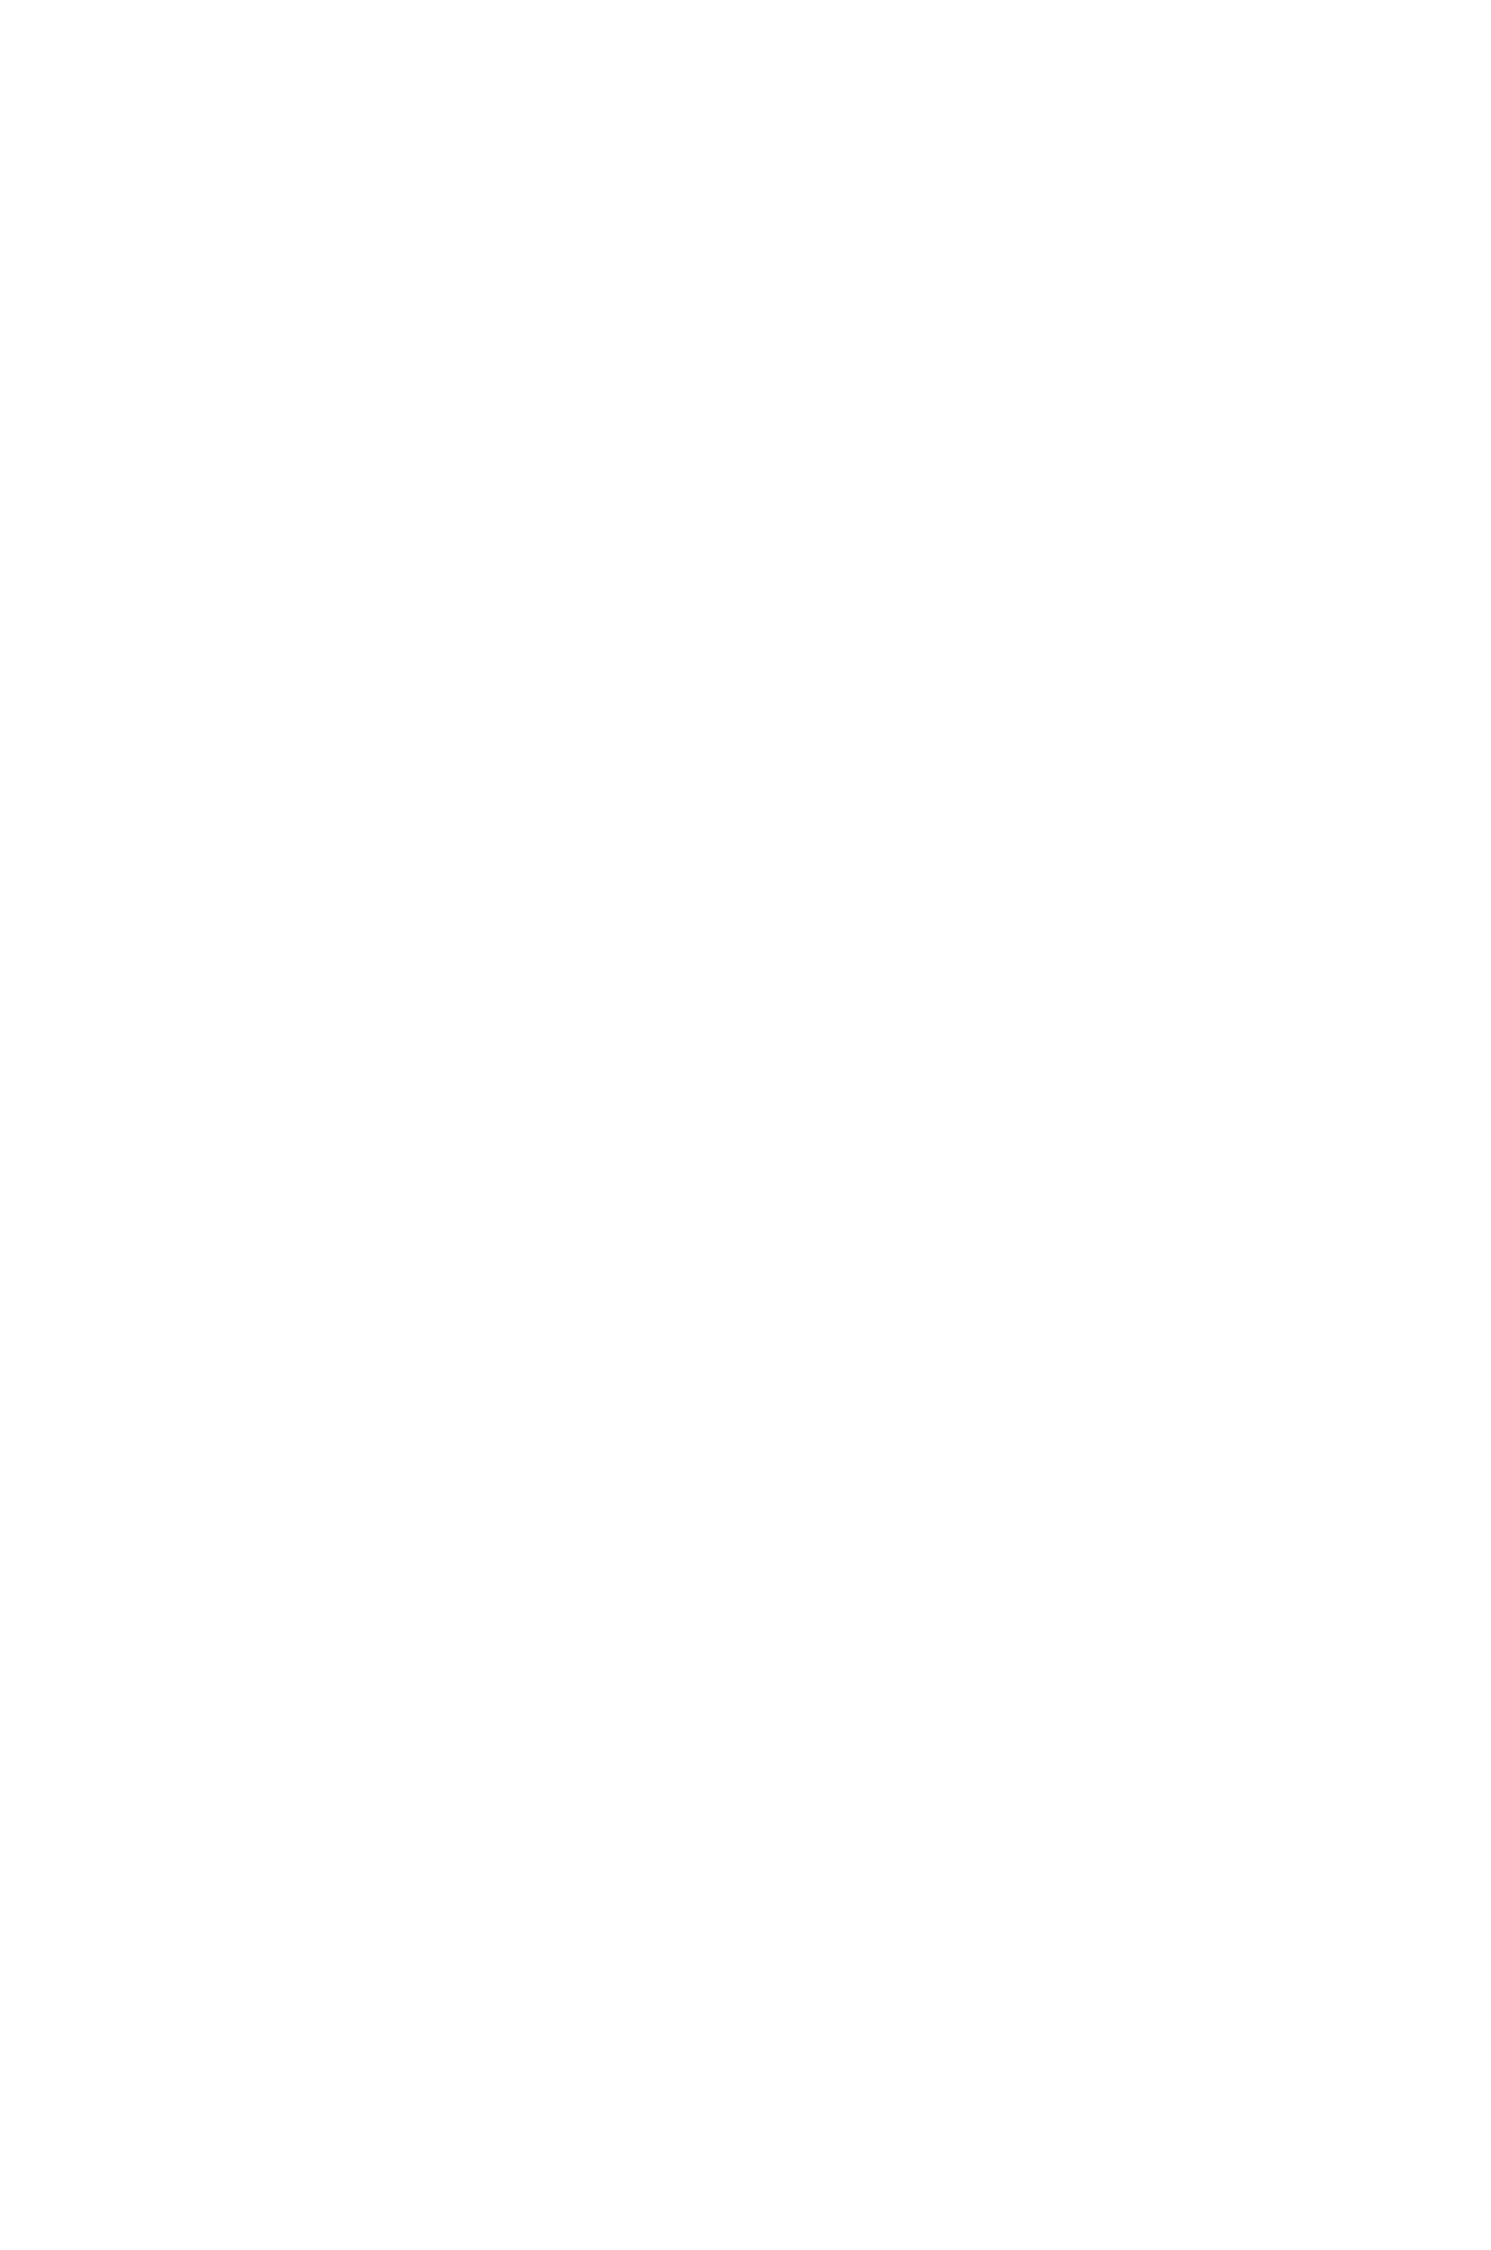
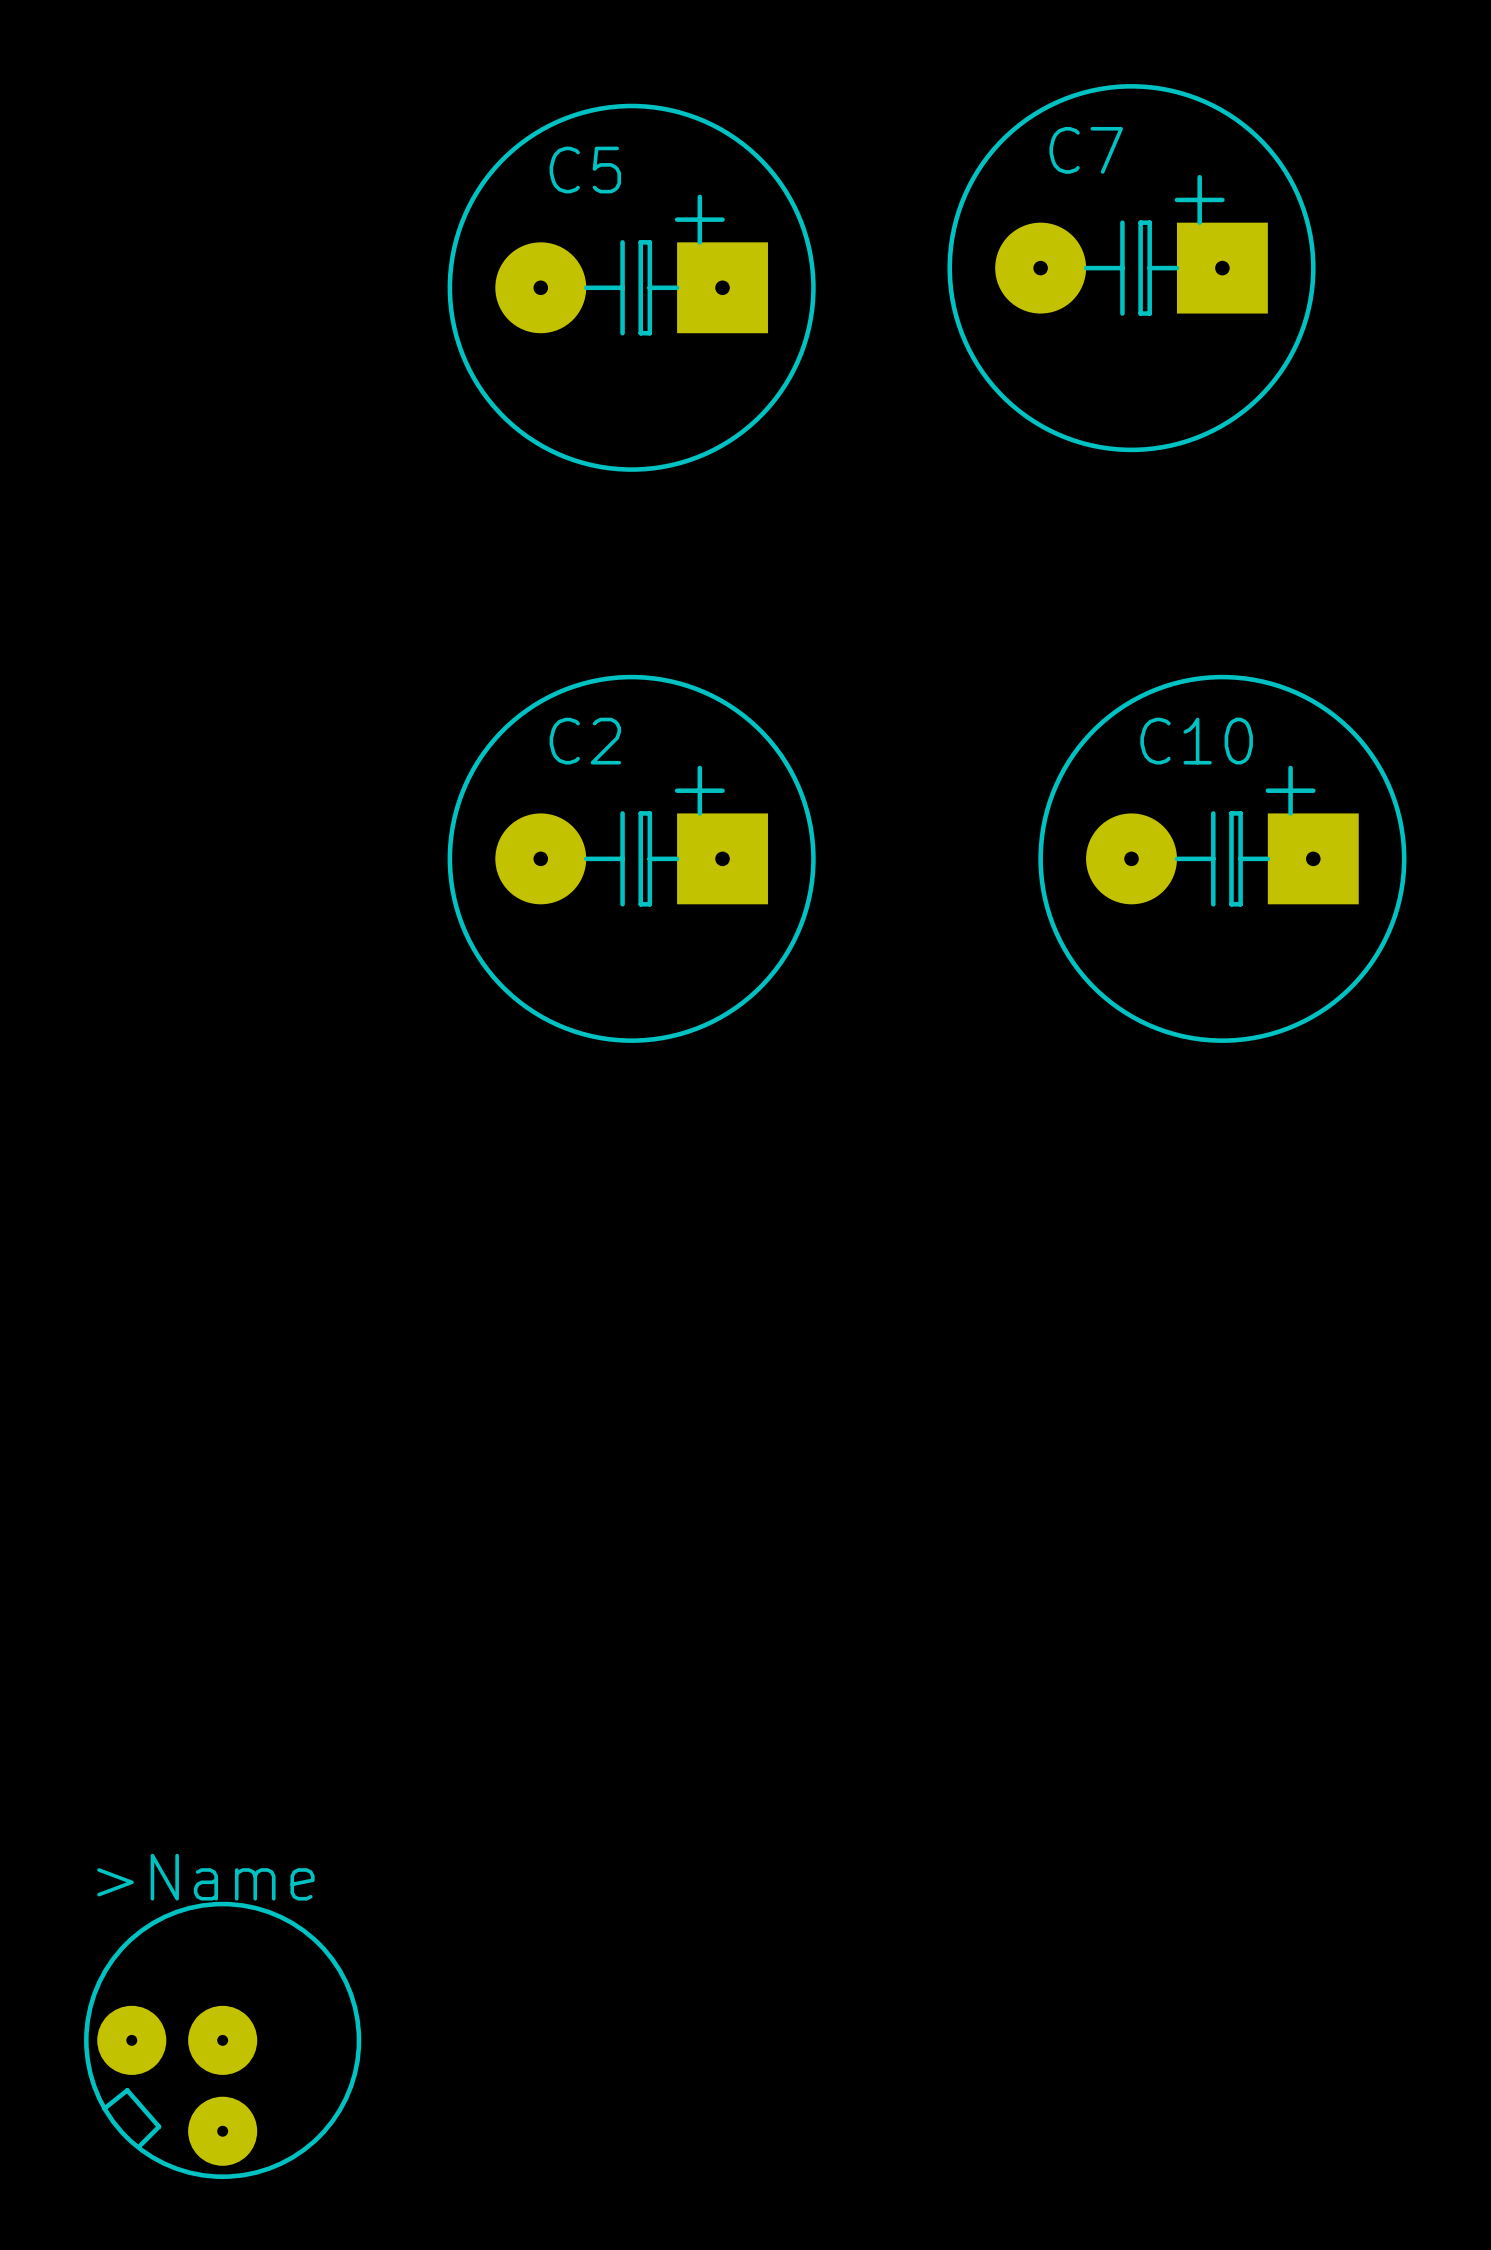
part: none -> (1131, 268)
part: none -> (631, 287)
part: none -> (631, 858)
part: none -> (1222, 858)
part: none -> (222, 2040)

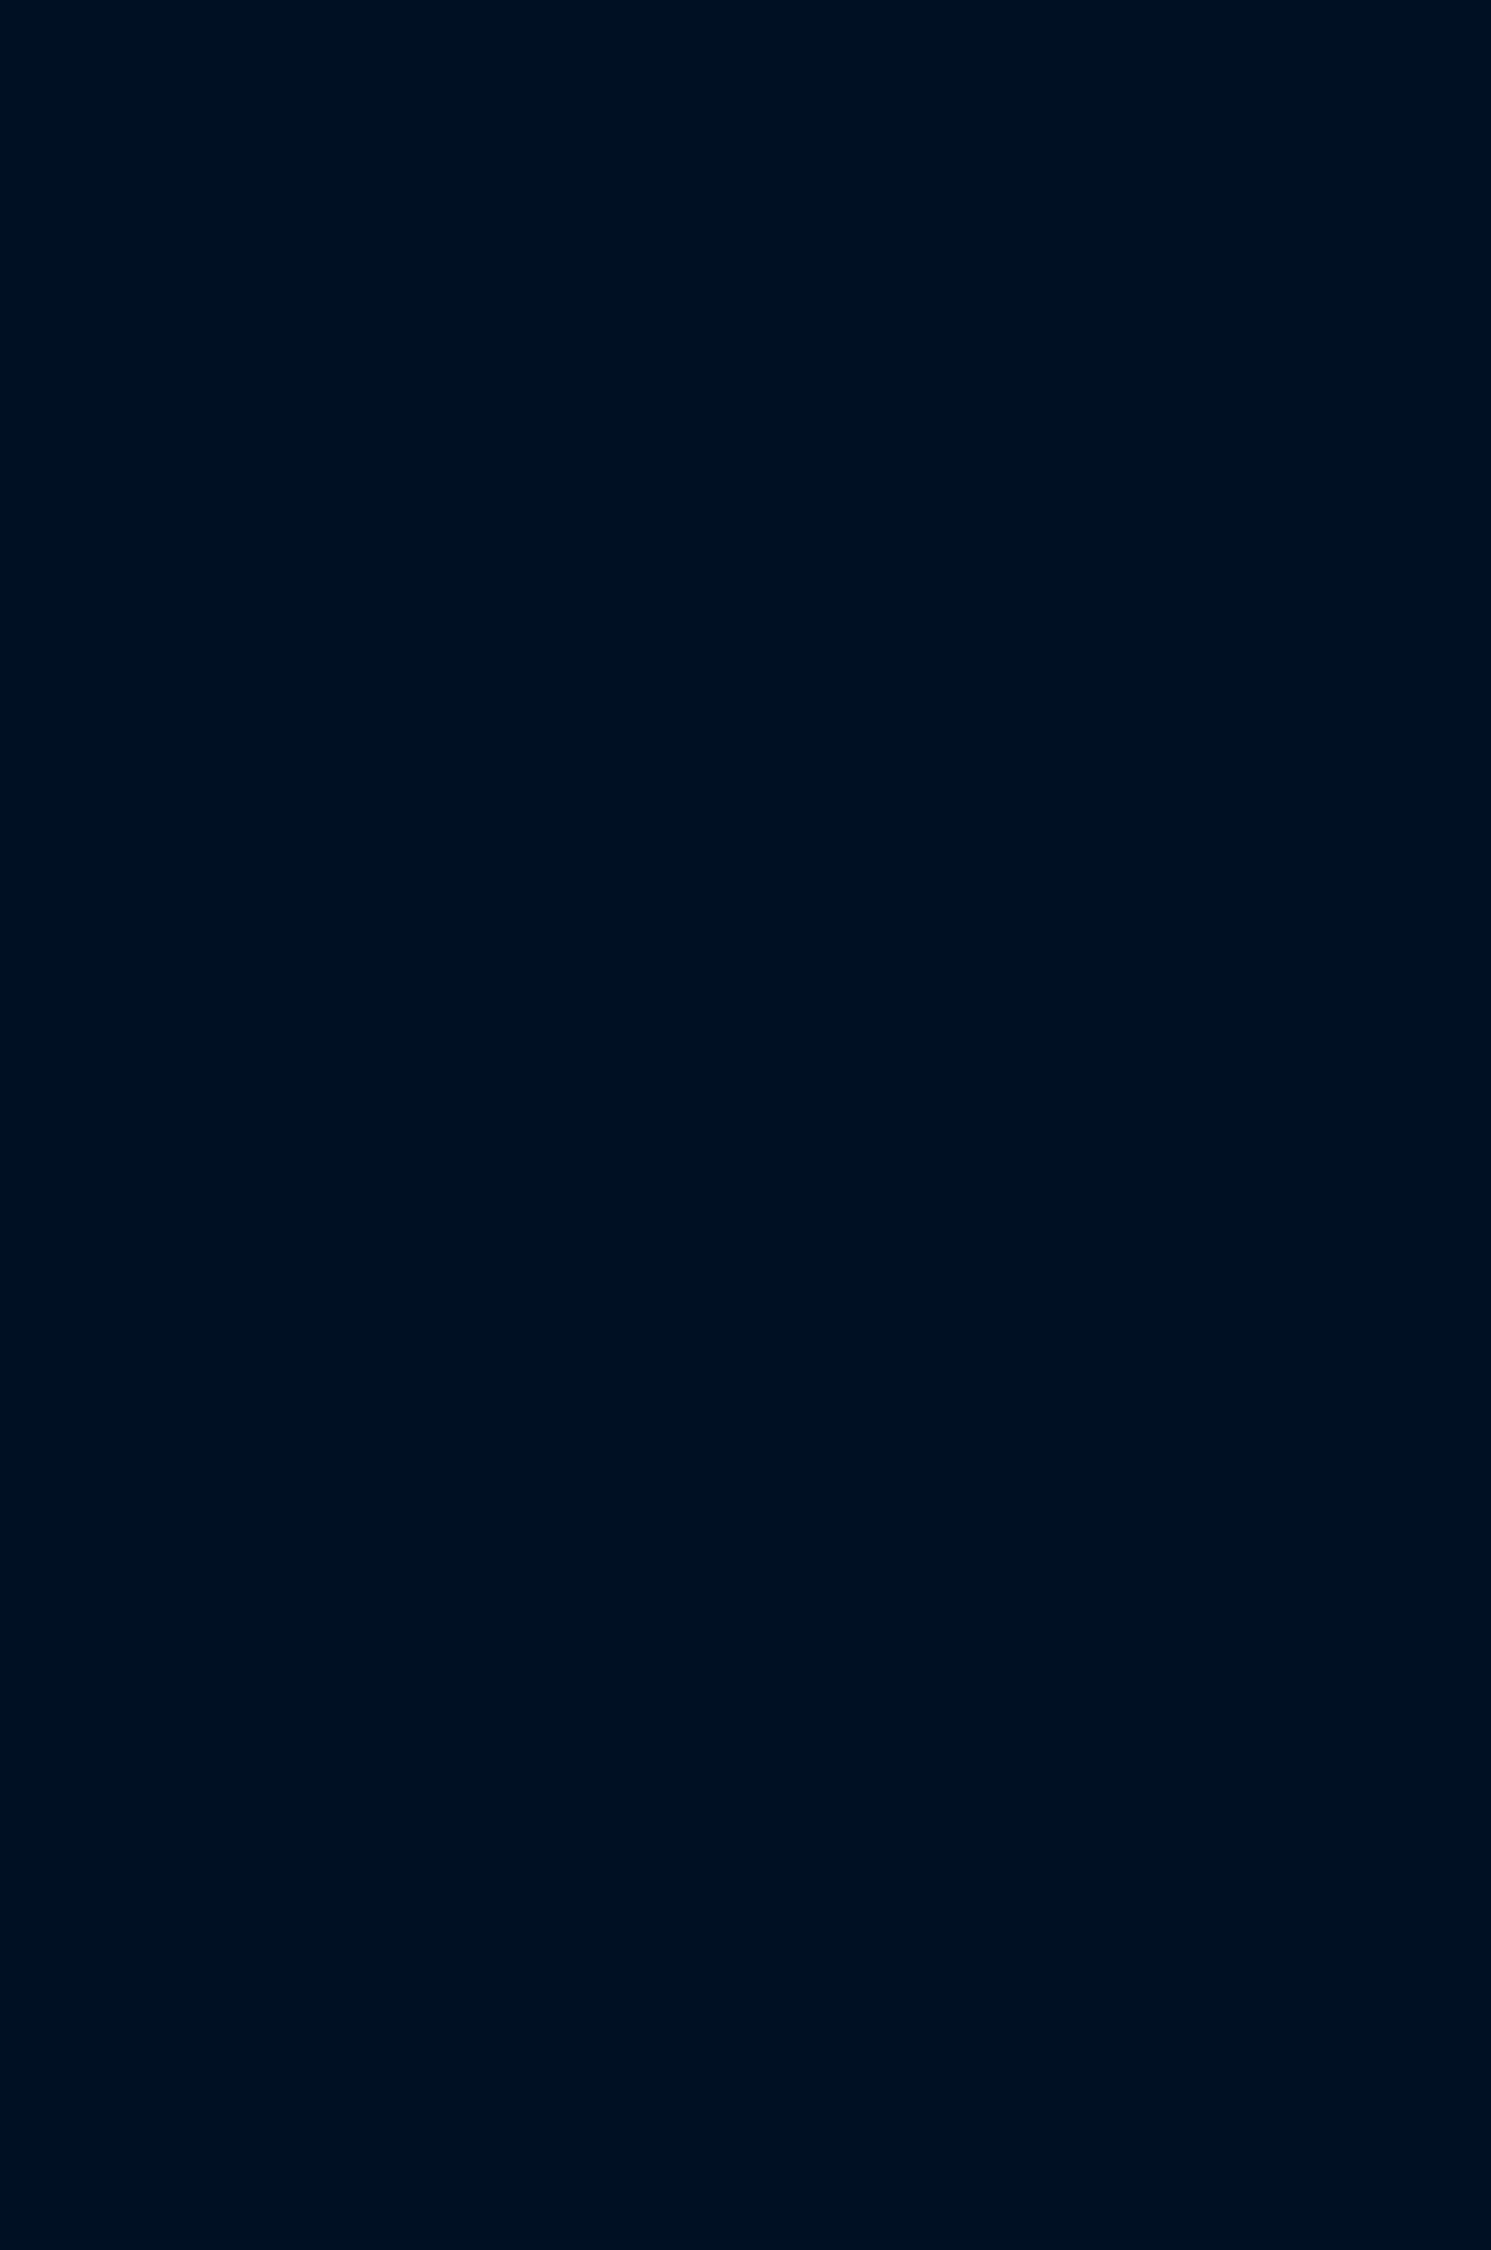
part: (1131, 268) -> none
part: (631, 287) -> none
part: (631, 858) -> none
part: (1222, 858) -> none
part: (222, 2040) -> none

